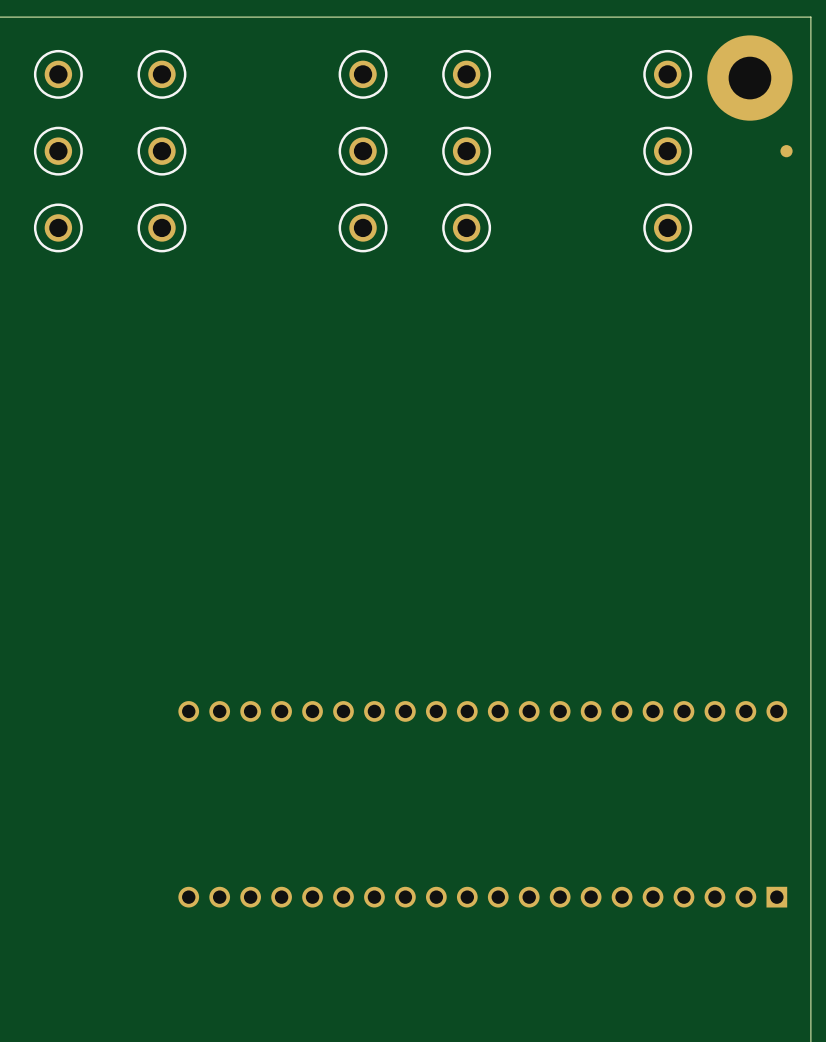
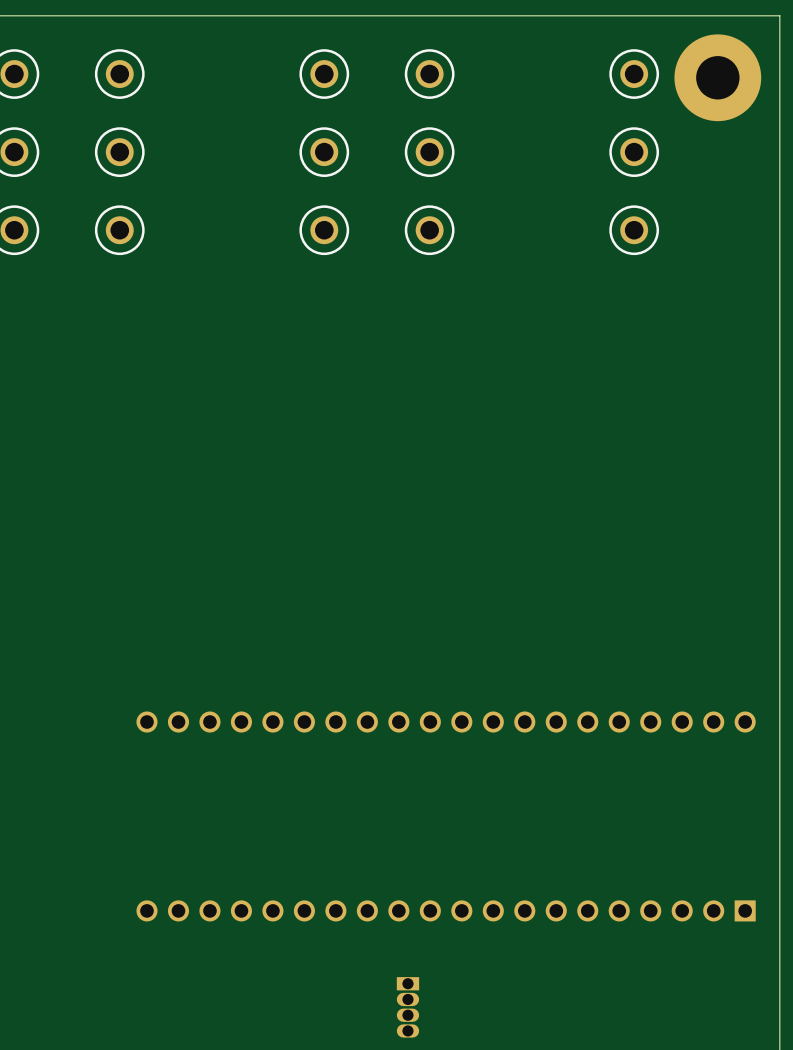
part: (786, 151) -> none
part: none -> (407, 1007)

